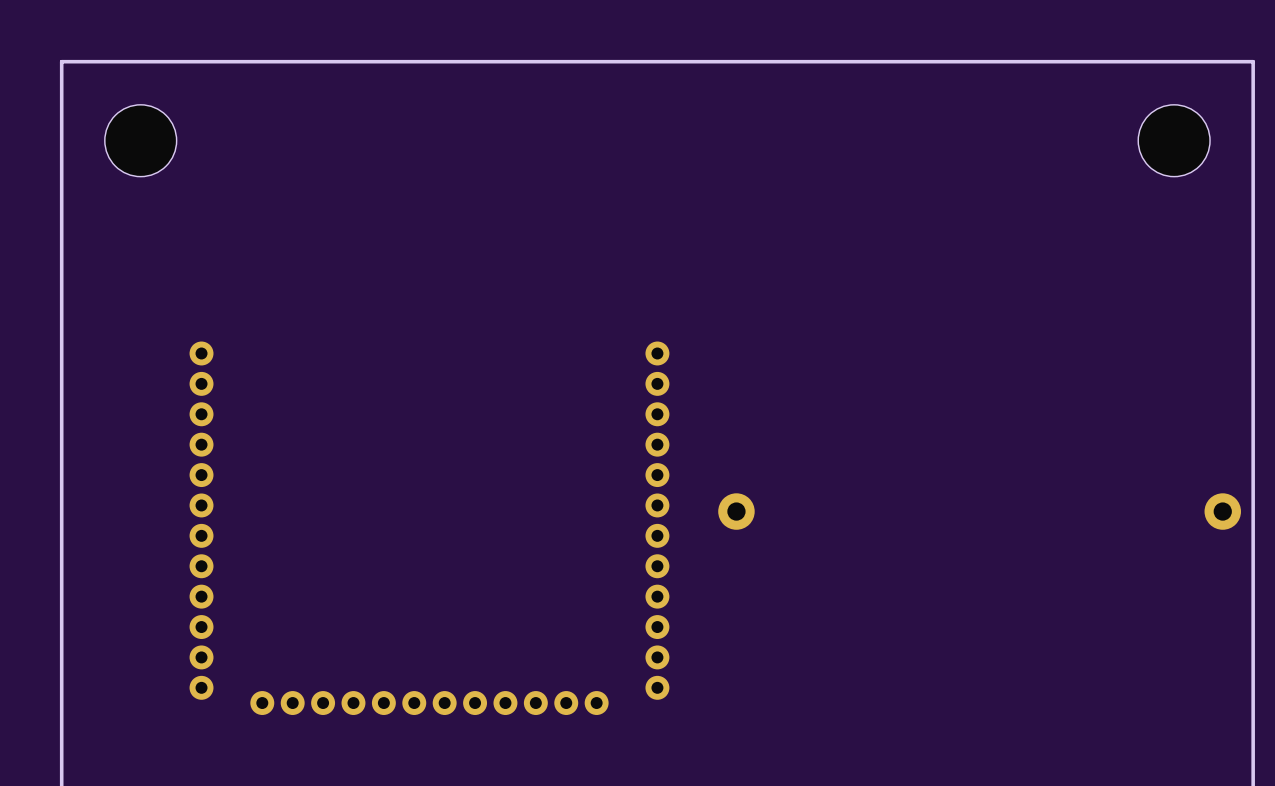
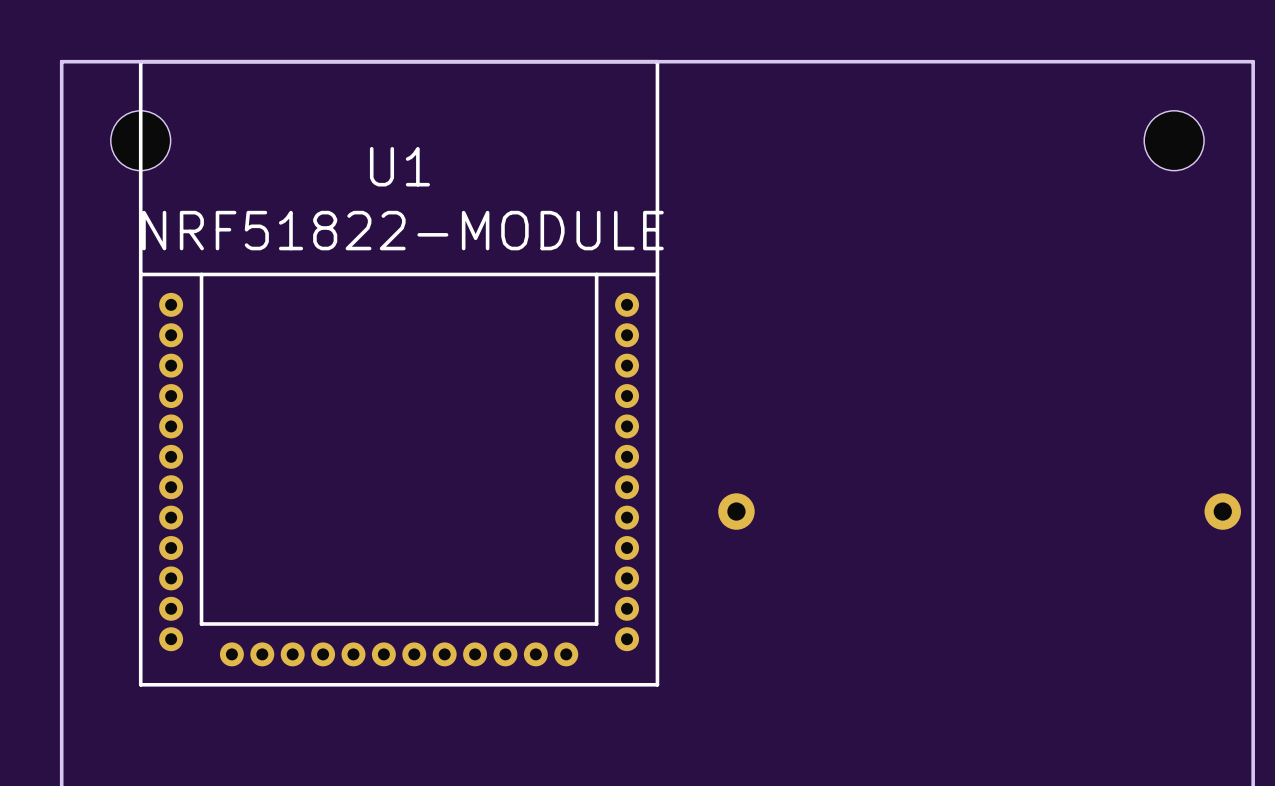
part footprint: [104, 104, 177, 177] -> [110, 110, 171, 171]
part footprint: [1138, 104, 1211, 177] -> [1144, 110, 1205, 171]
U1 side: top (429, 528) -> bottom (399, 373)

